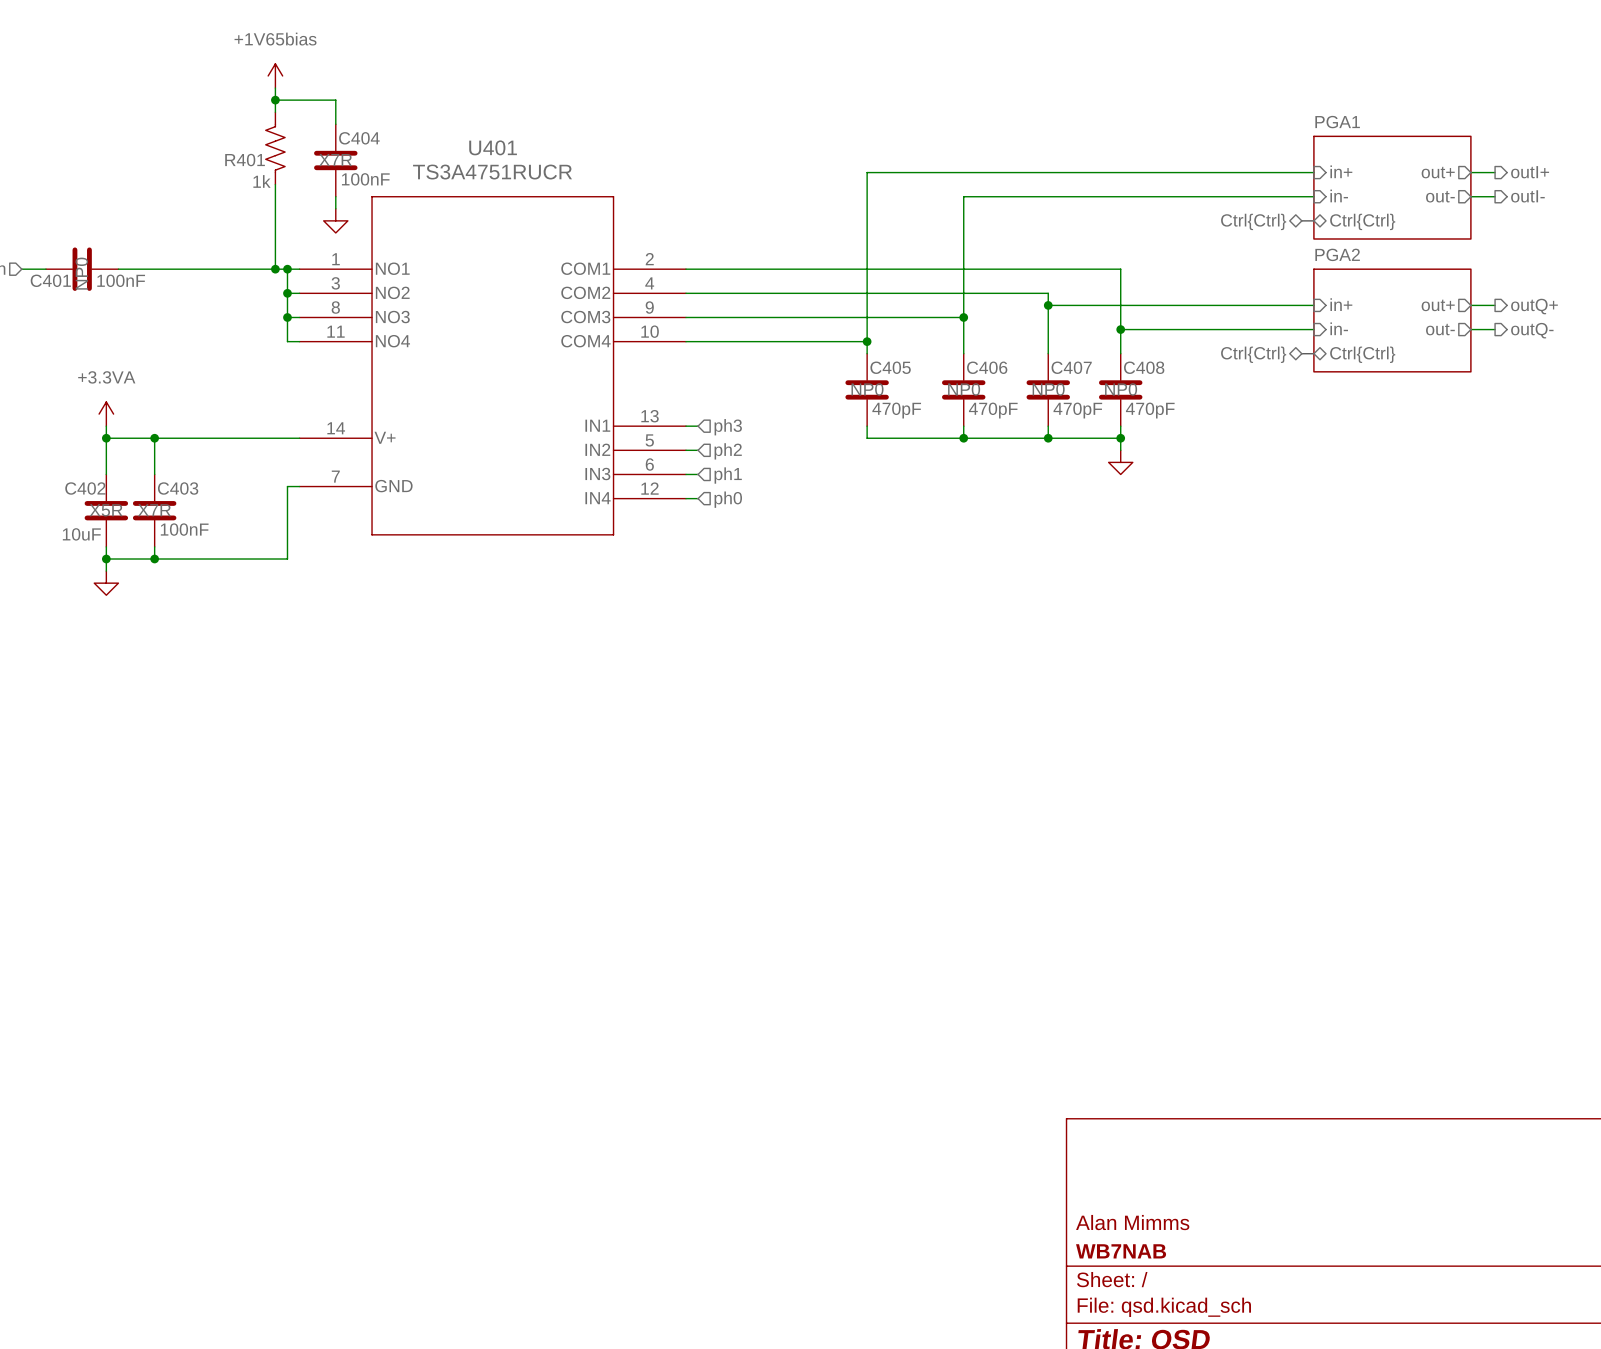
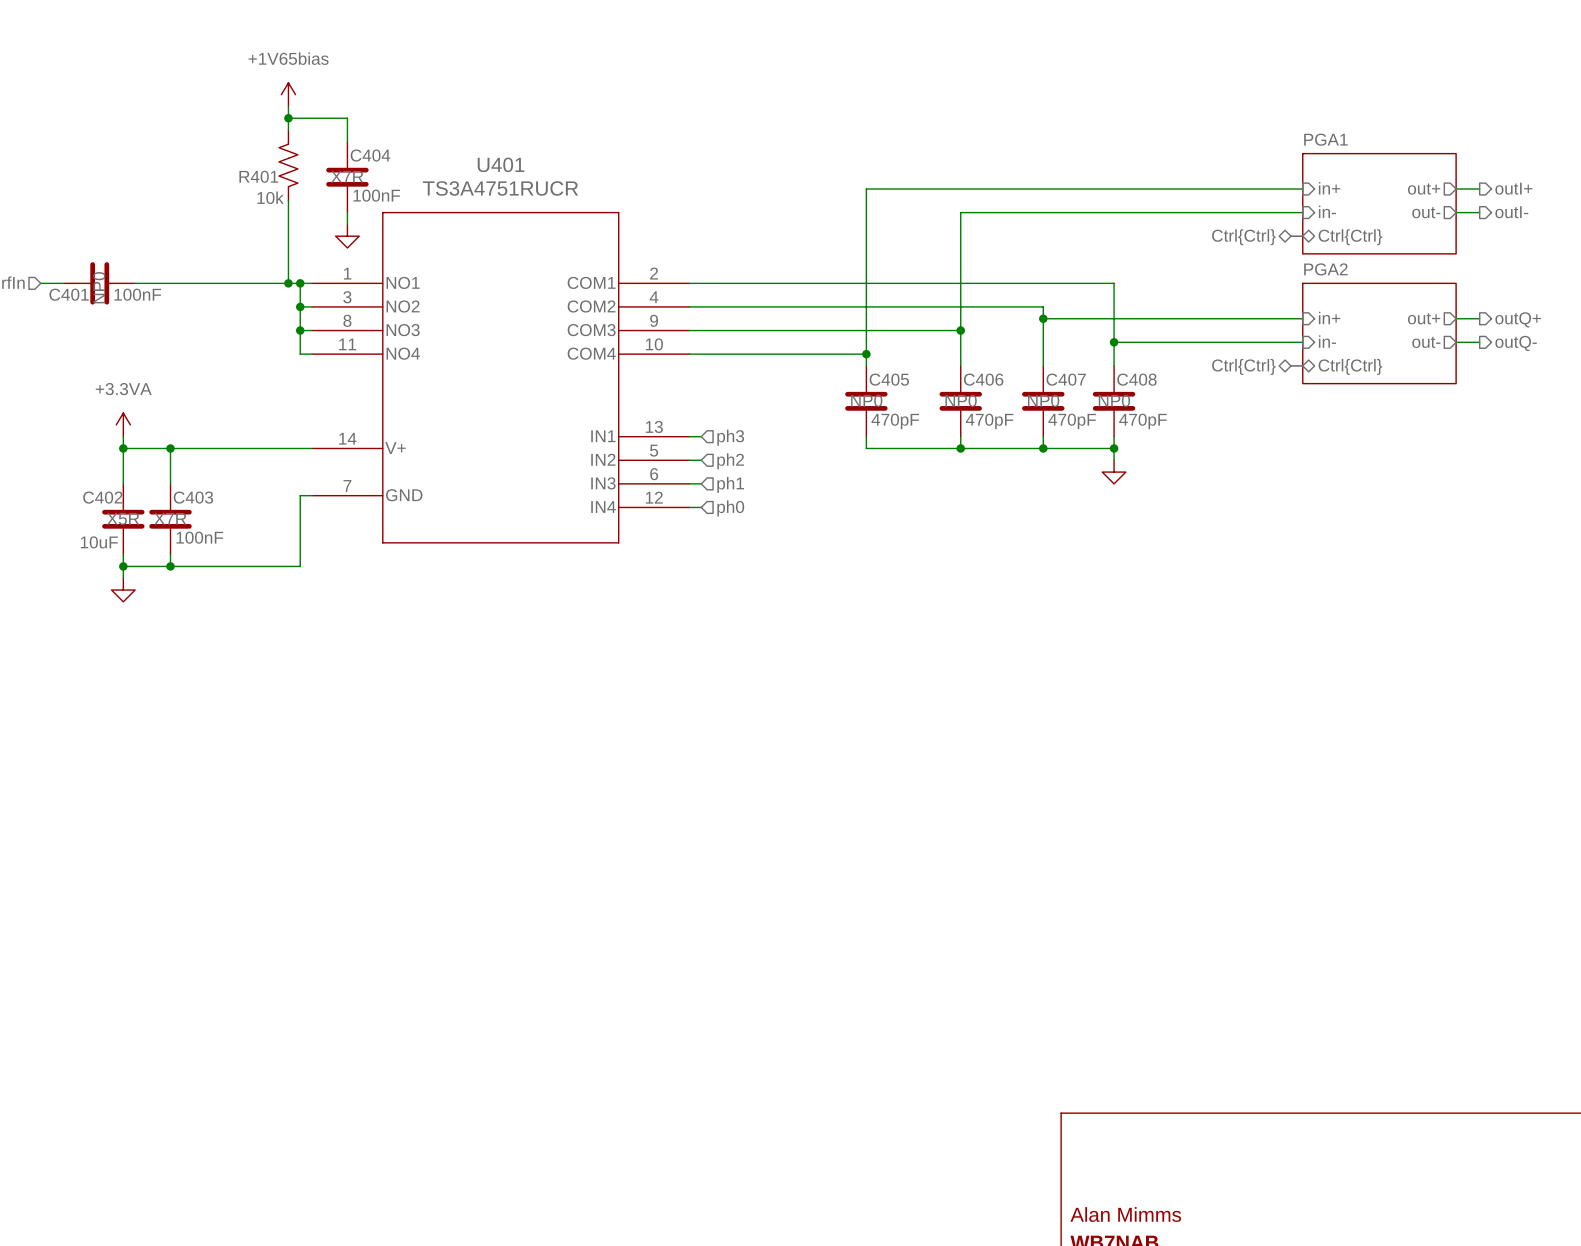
R401 value: 1k (261, 181) -> 10k (270, 197)

